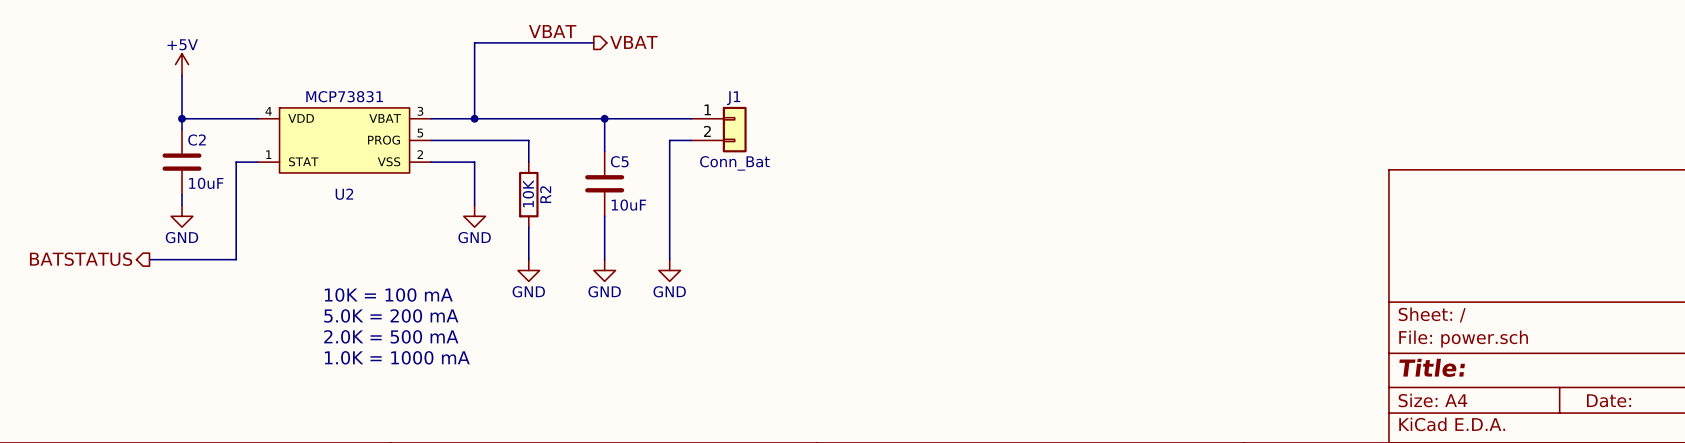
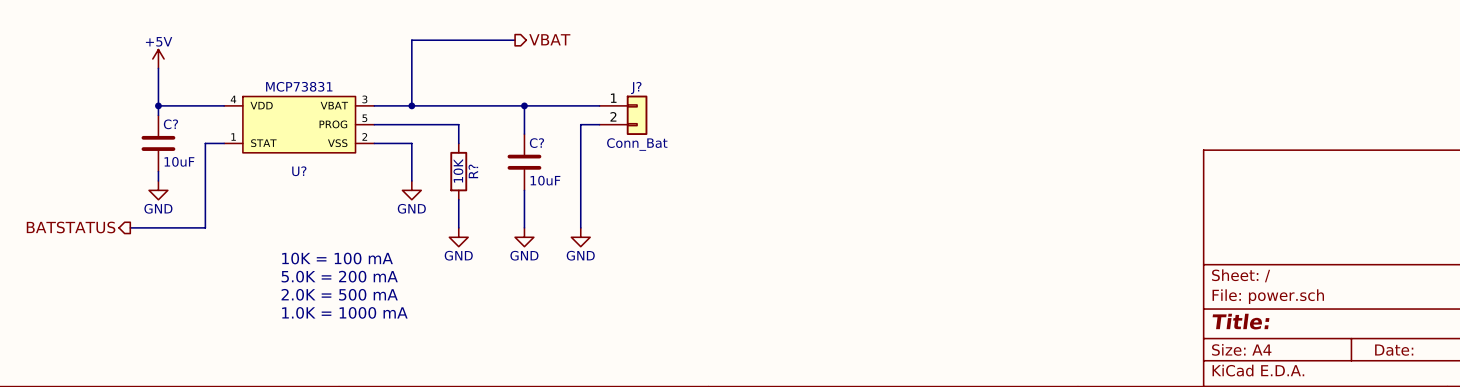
label: VBAT (552, 31) -> none
J1 name: J1 (733, 98) -> J? (636, 87)
C2 name: C2 (197, 140) -> C? (170, 124)
C5 name: C5 (619, 161) -> C? (536, 143)
U2 name: U2 (344, 194) -> U? (299, 171)
R2 name: R2 (545, 194) -> R? (473, 171)

